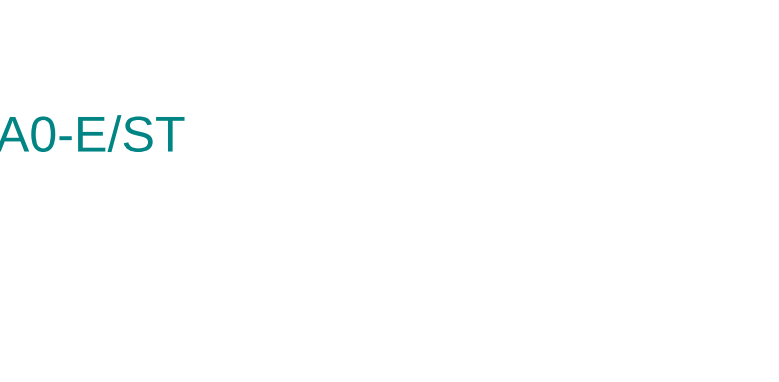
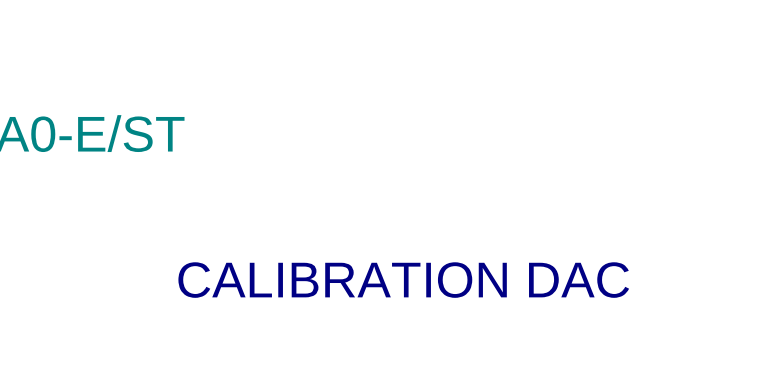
text: none -> CALIBRATION DAC (403, 280)

